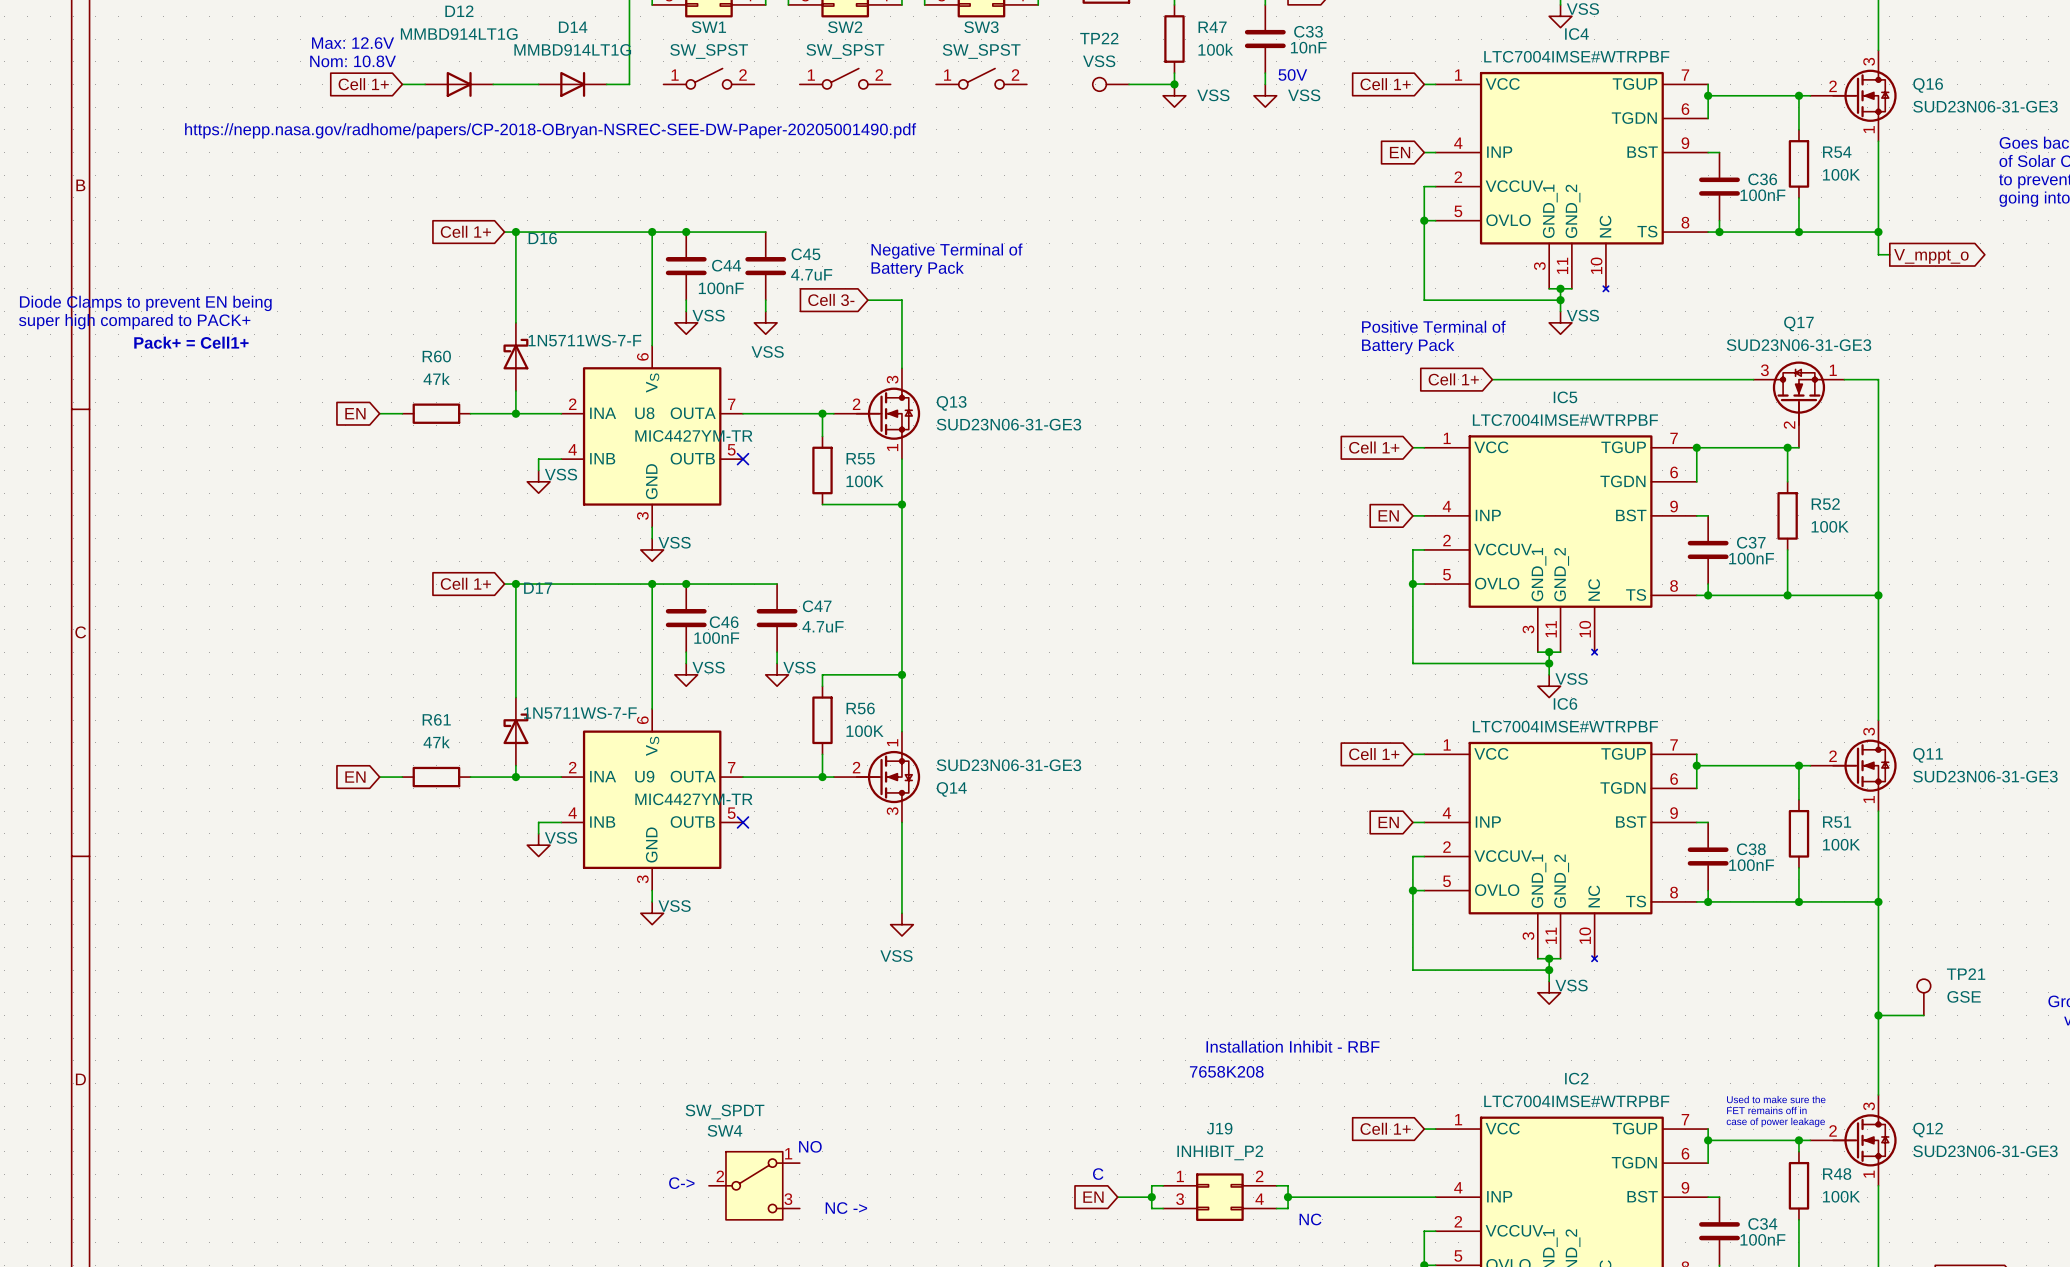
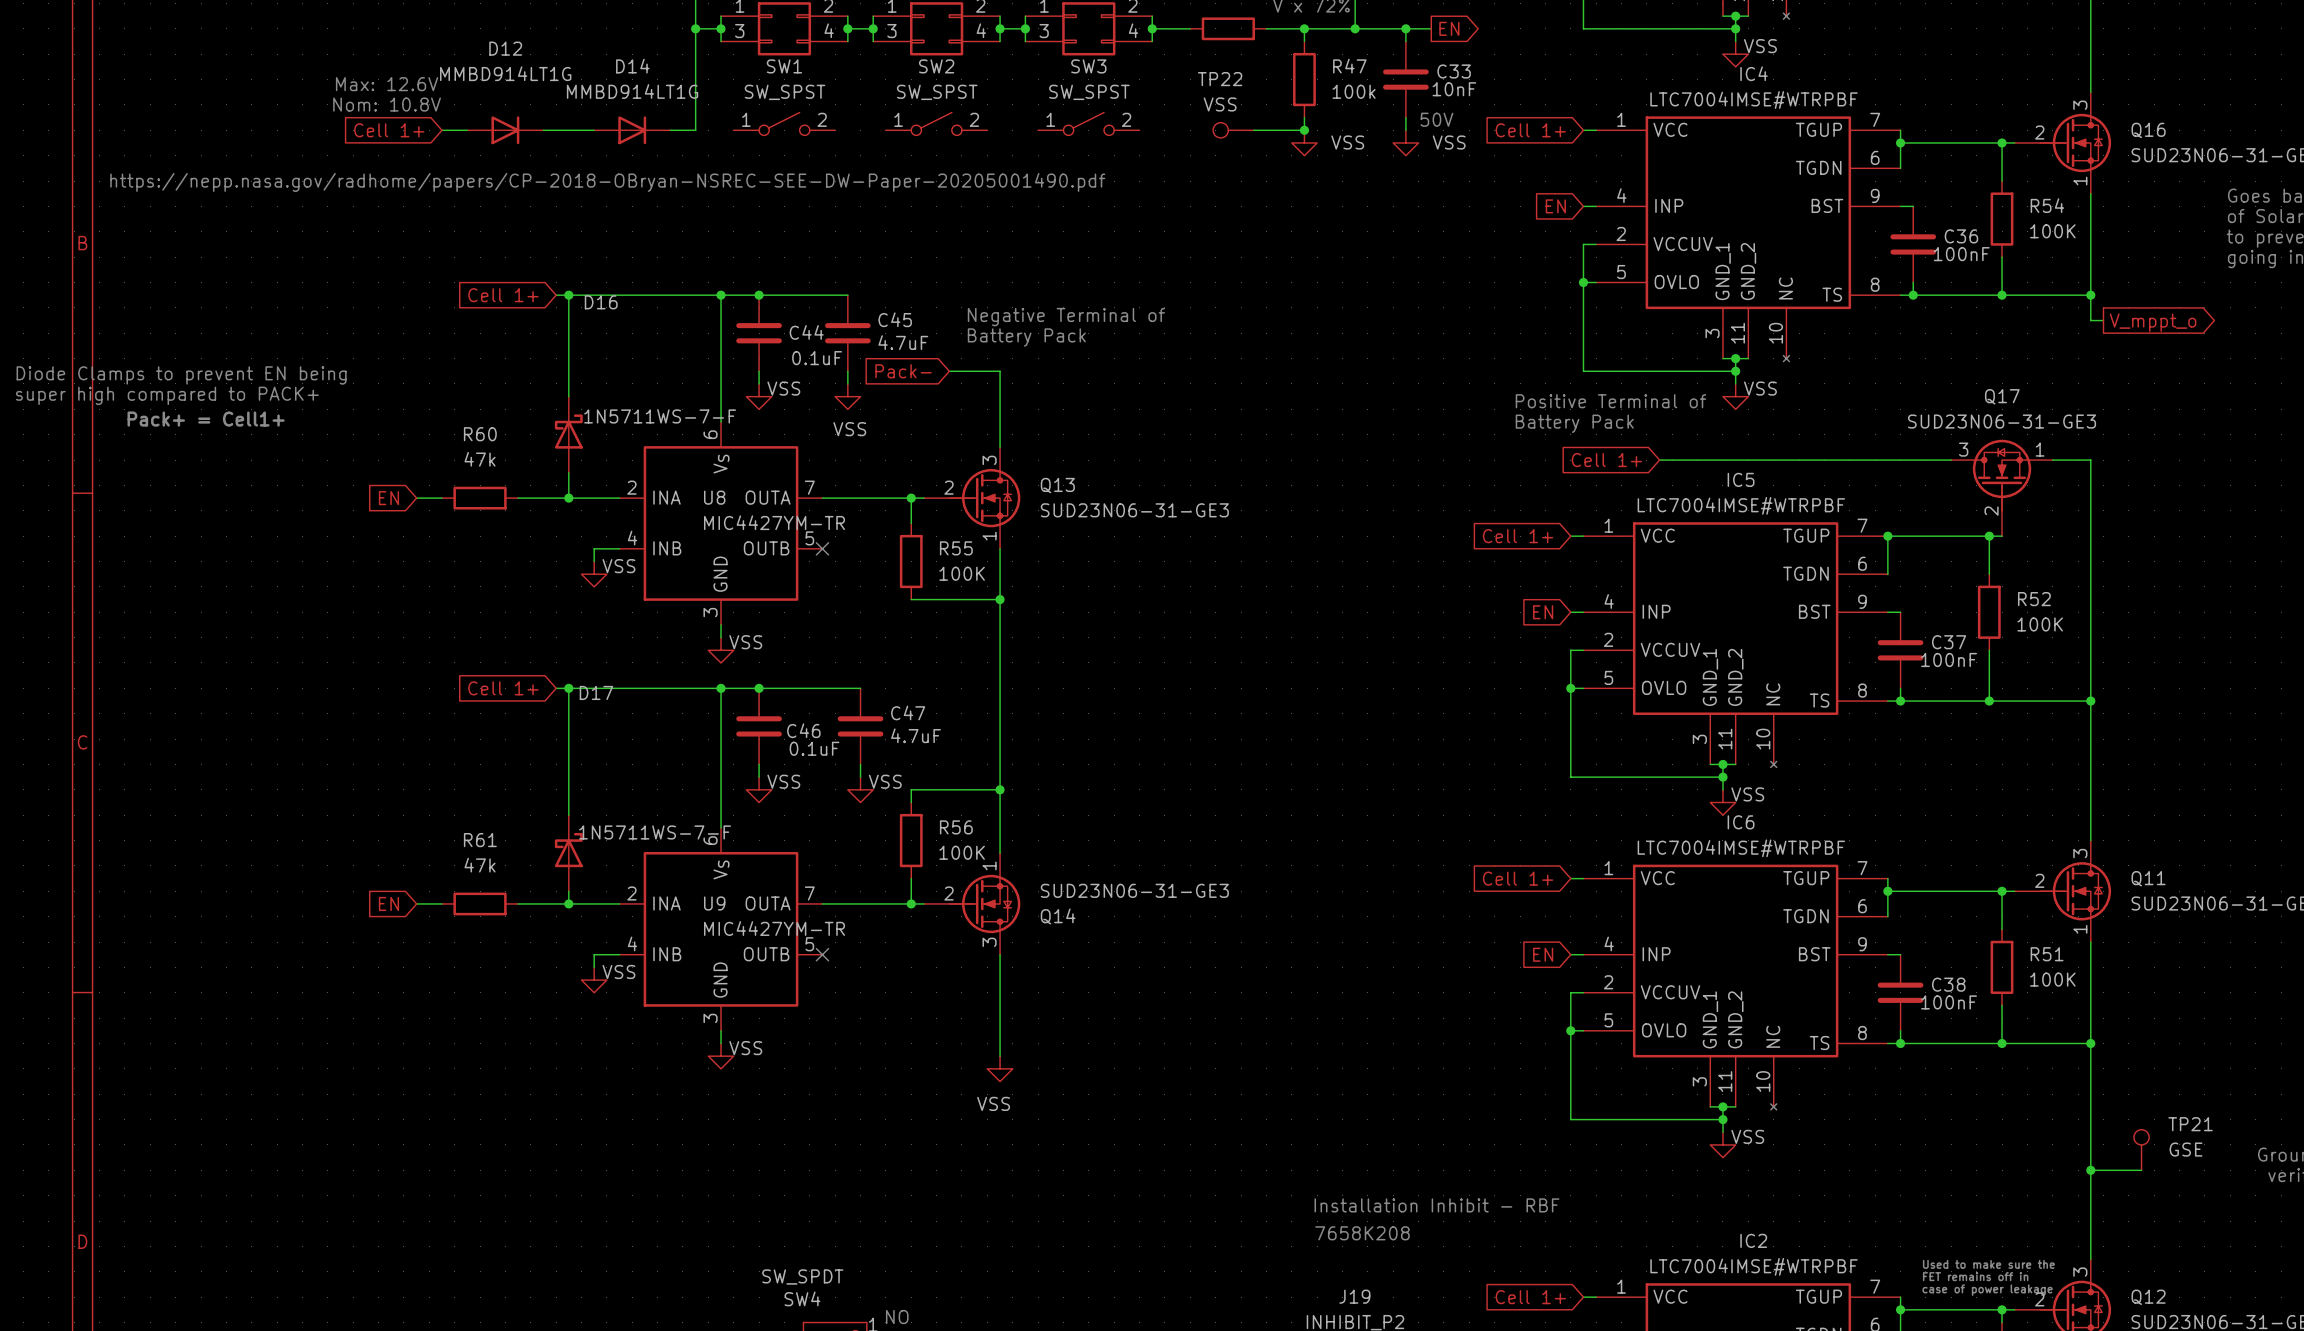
C44 value: 100nF (721, 288) -> 0.1uF (817, 358)
global label: none -> Pack- (903, 371)
global label: Cell 3- (831, 299) -> none
wire: none -> (949, 371) (961, 371)
C46 value: 100nF (716, 638) -> 0.1uF (814, 748)

